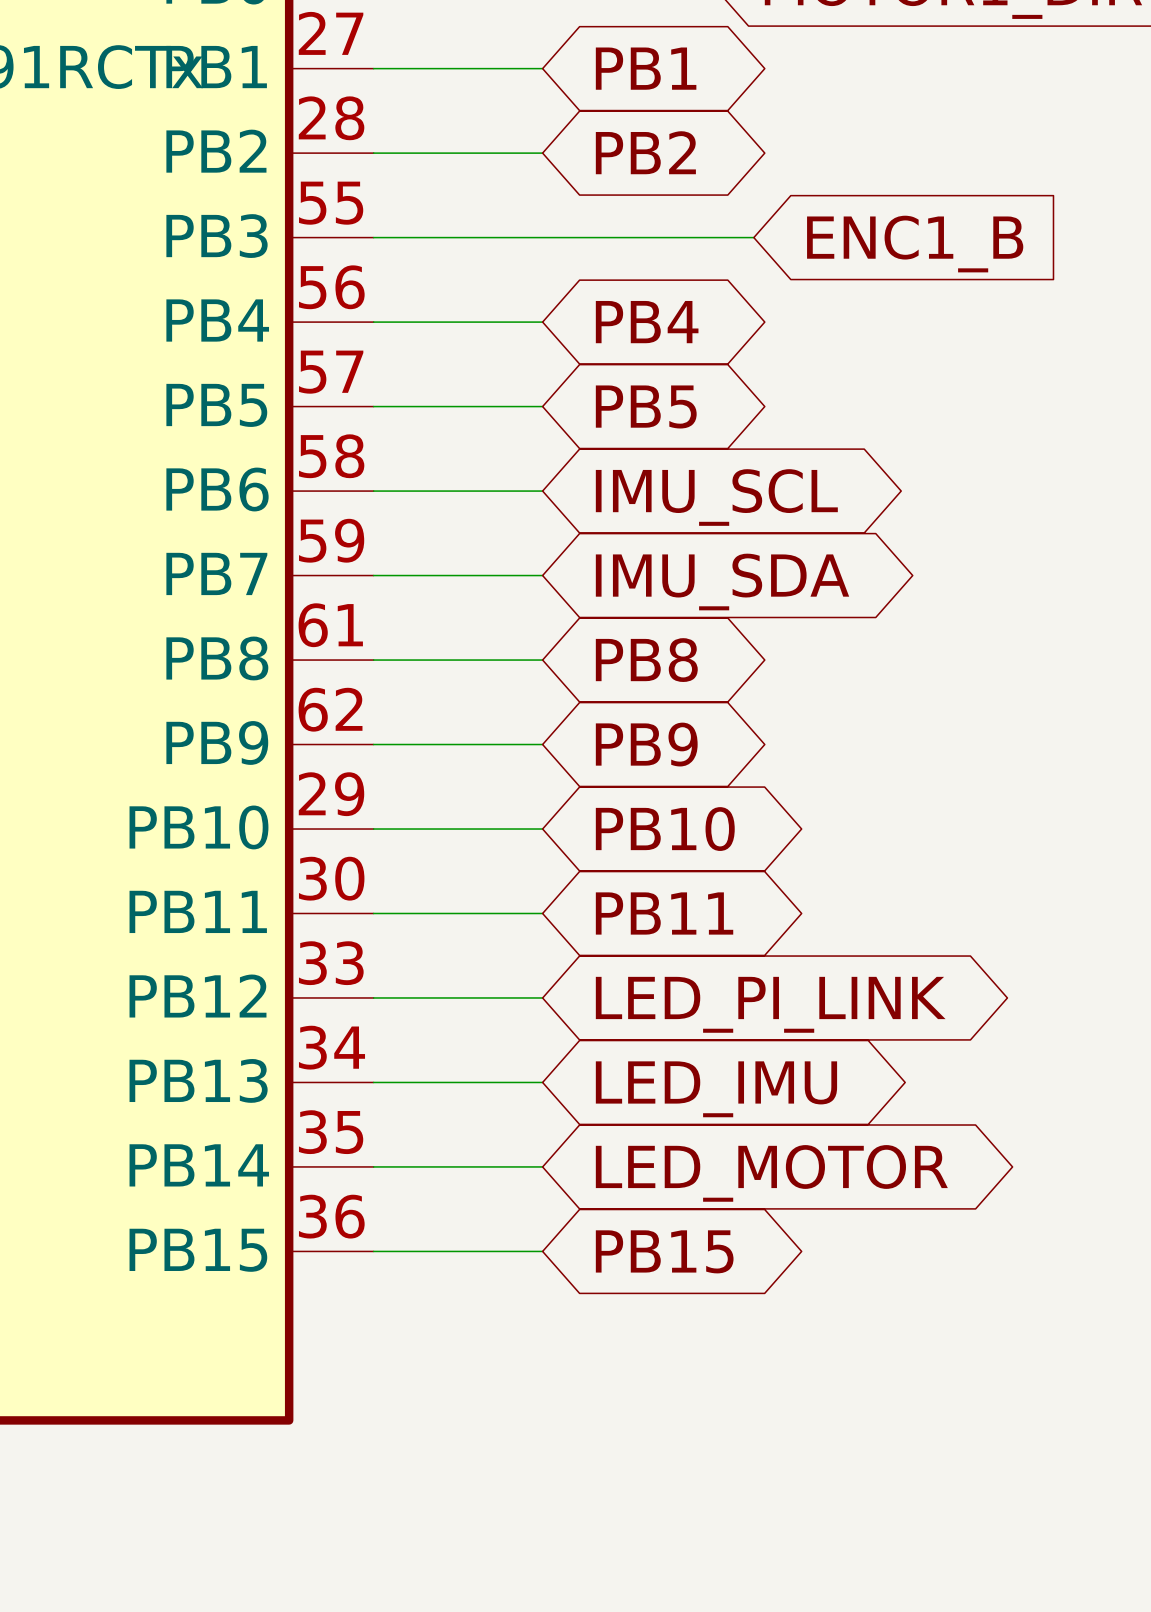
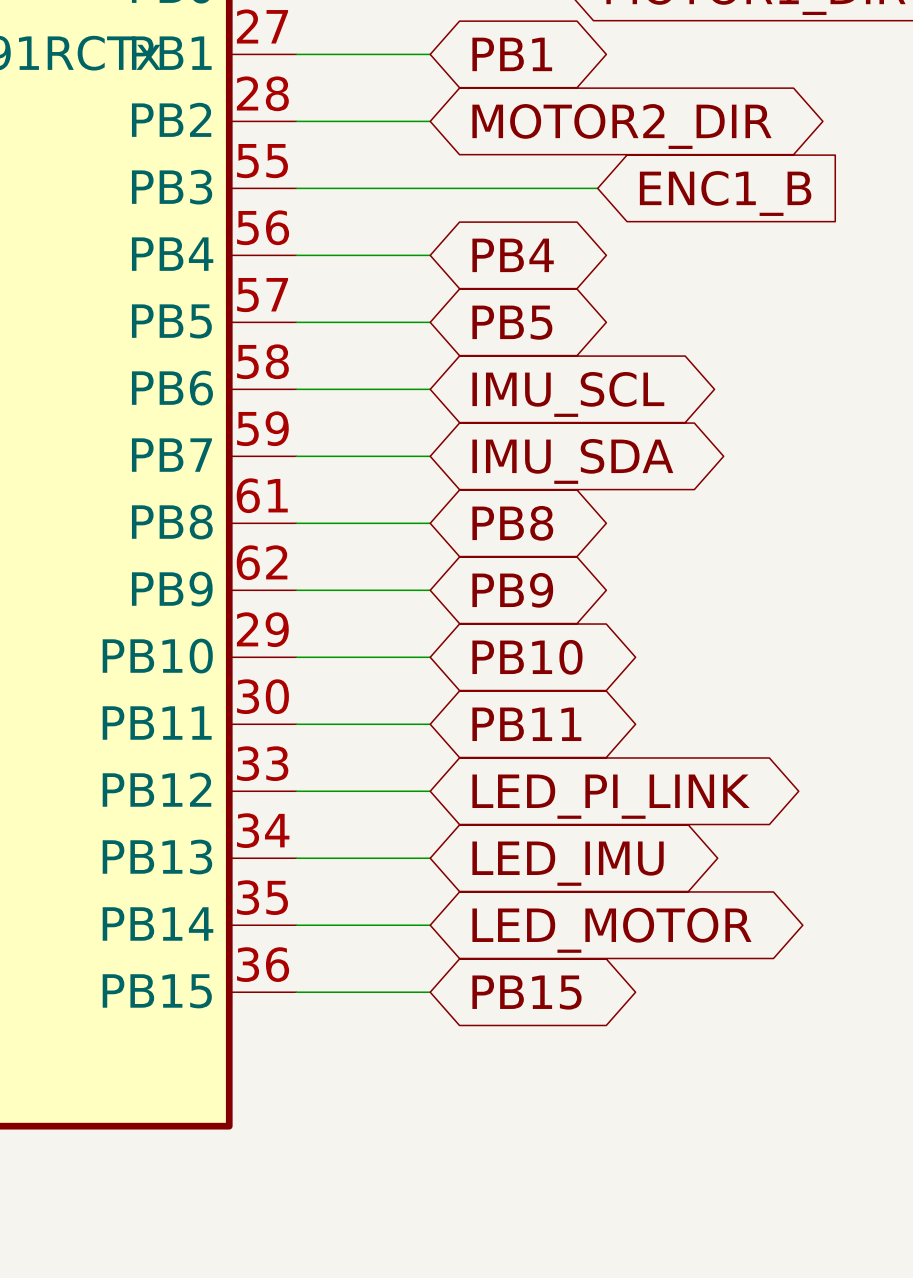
global label: PB2 (645, 152) -> MOTOR2_DIR (621, 126)

